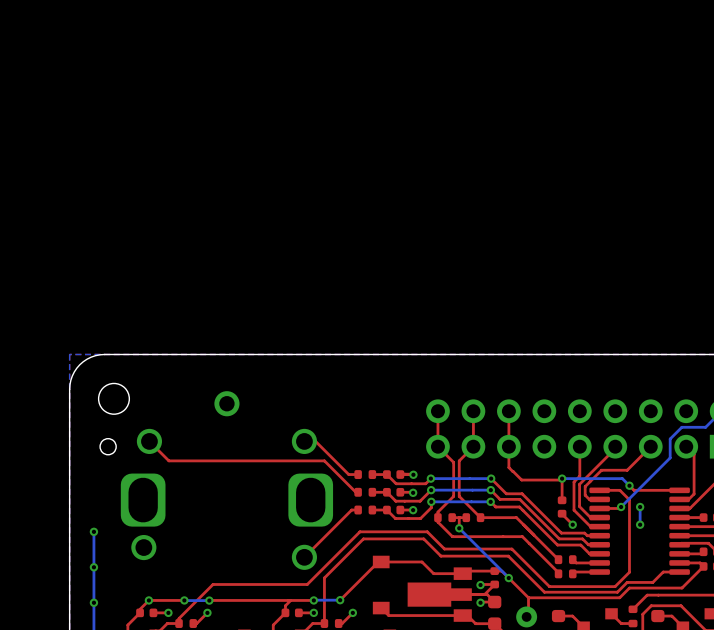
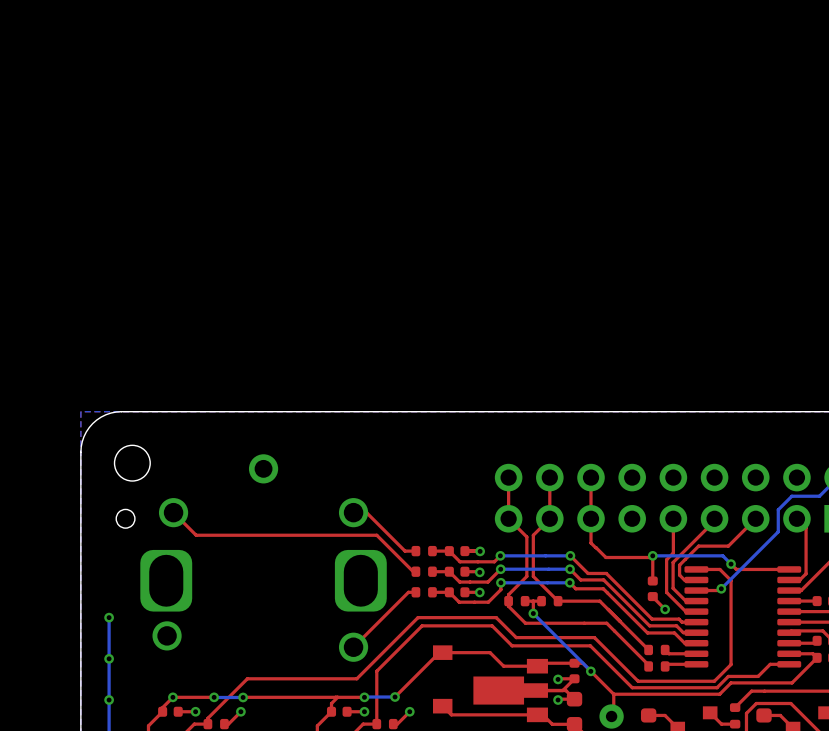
bottom track: (640, 507) (640, 524) -> none
via: (640, 507) -> none
via: (640, 524) -> none

